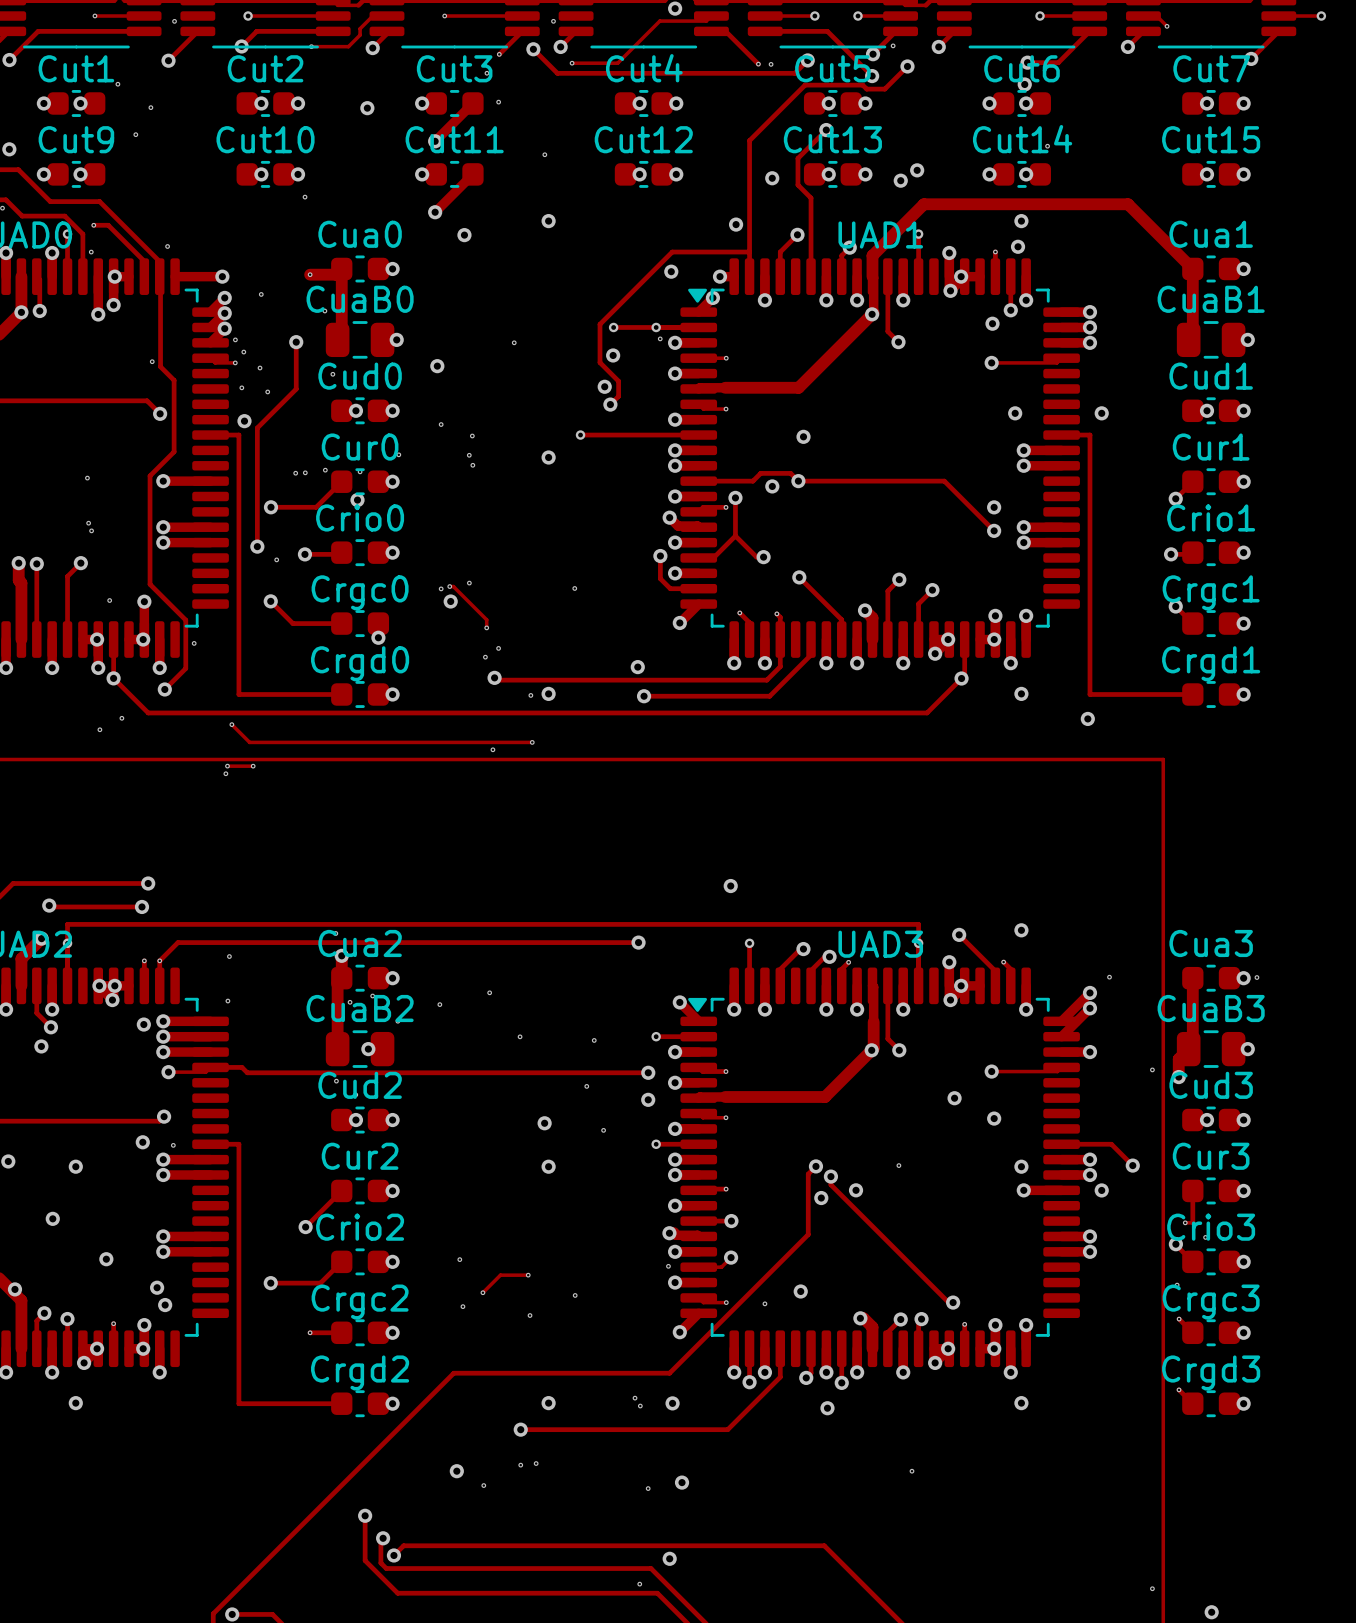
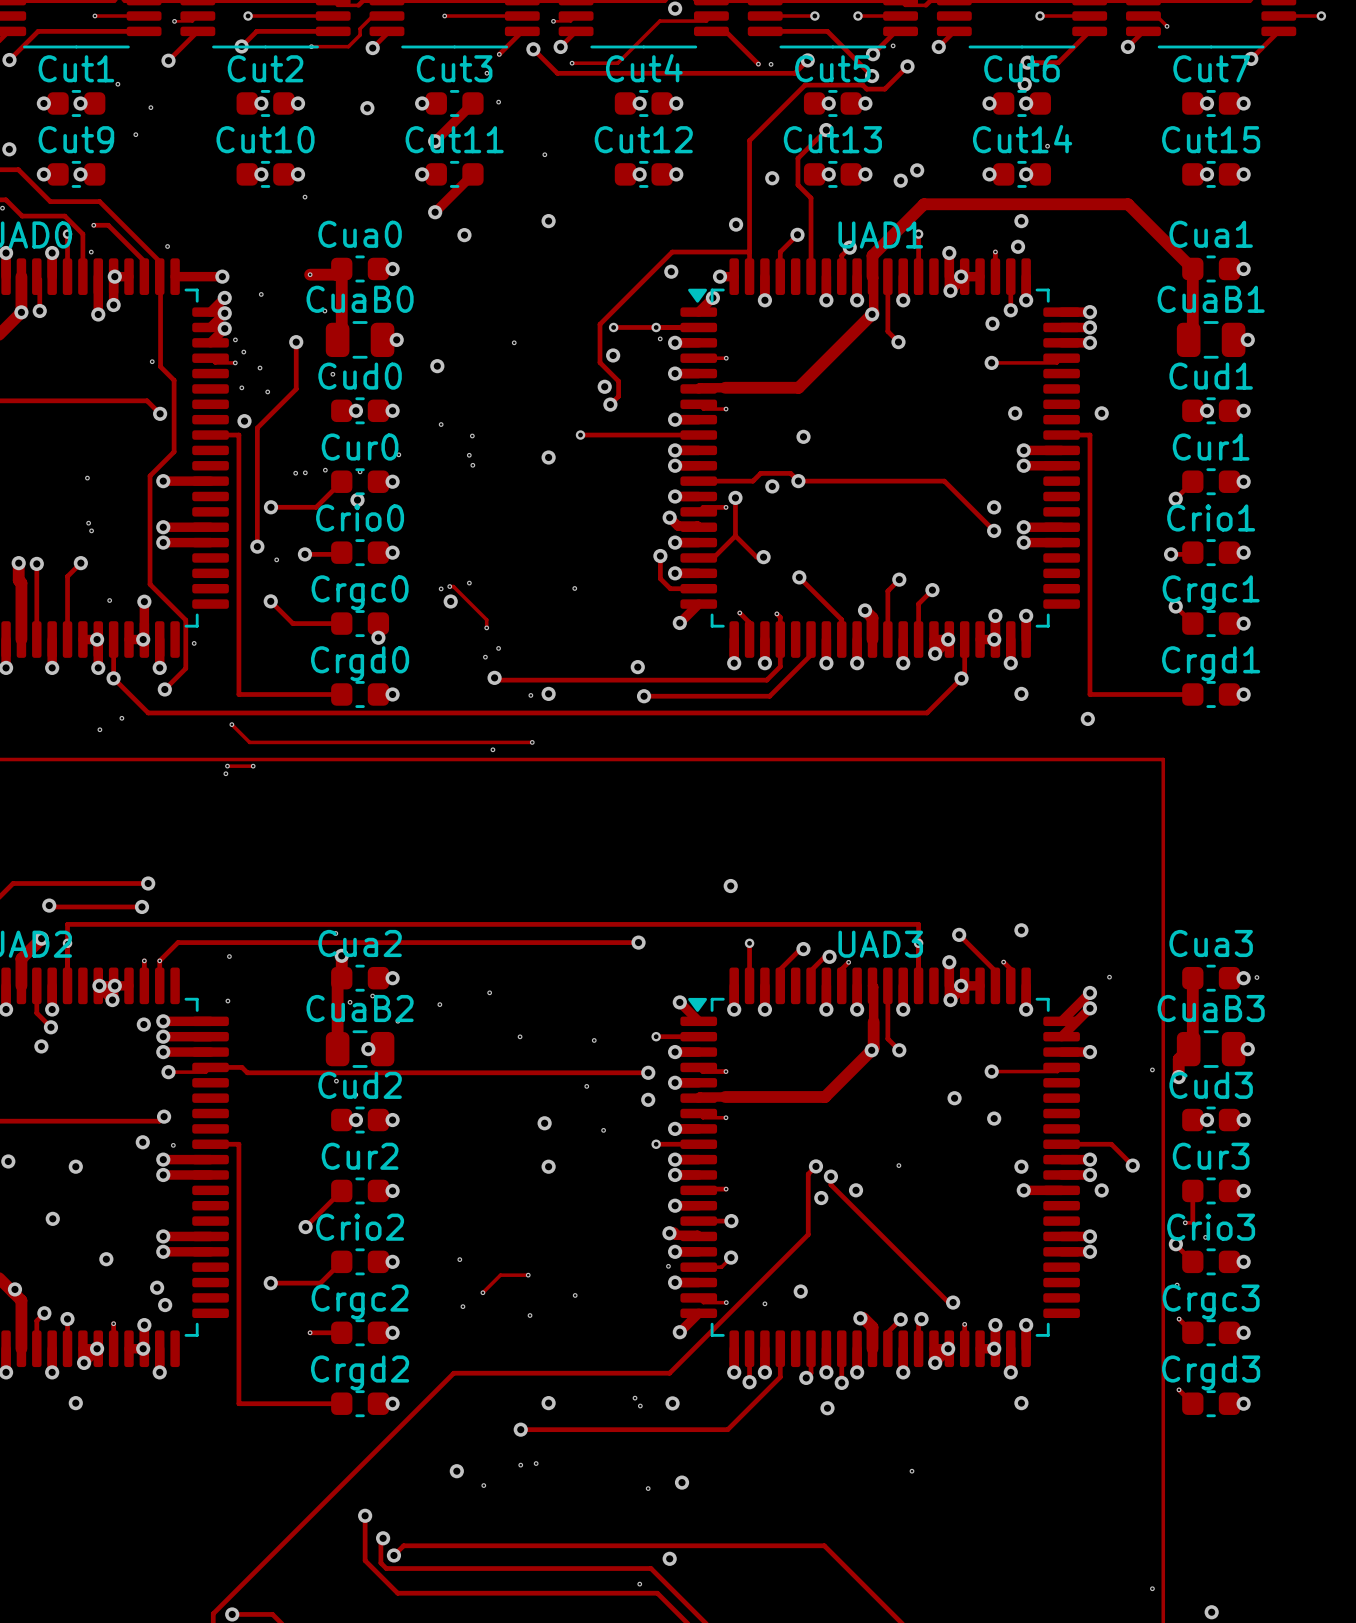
track: none -> (197, 16) (192, 21) (174, 21)
track: none -> (576, 16) (570, 21) (553, 21)

